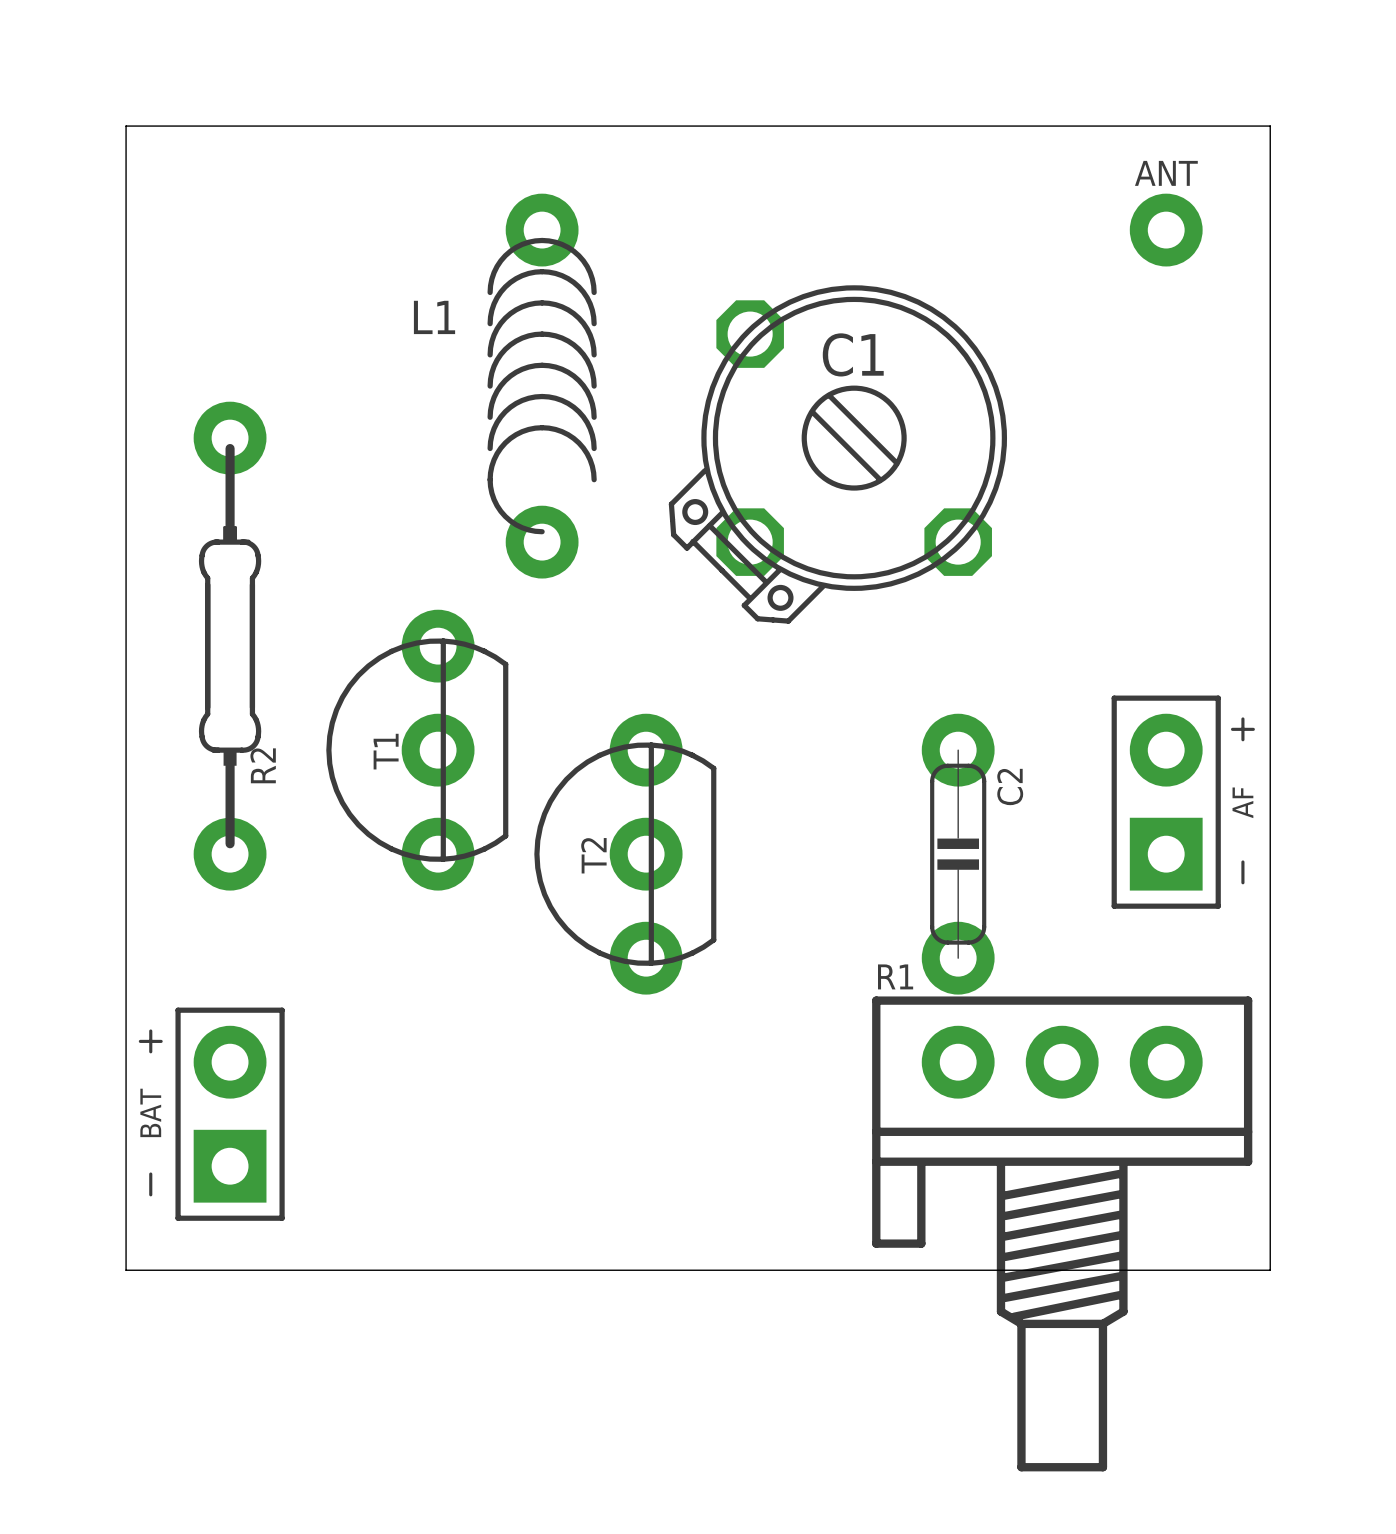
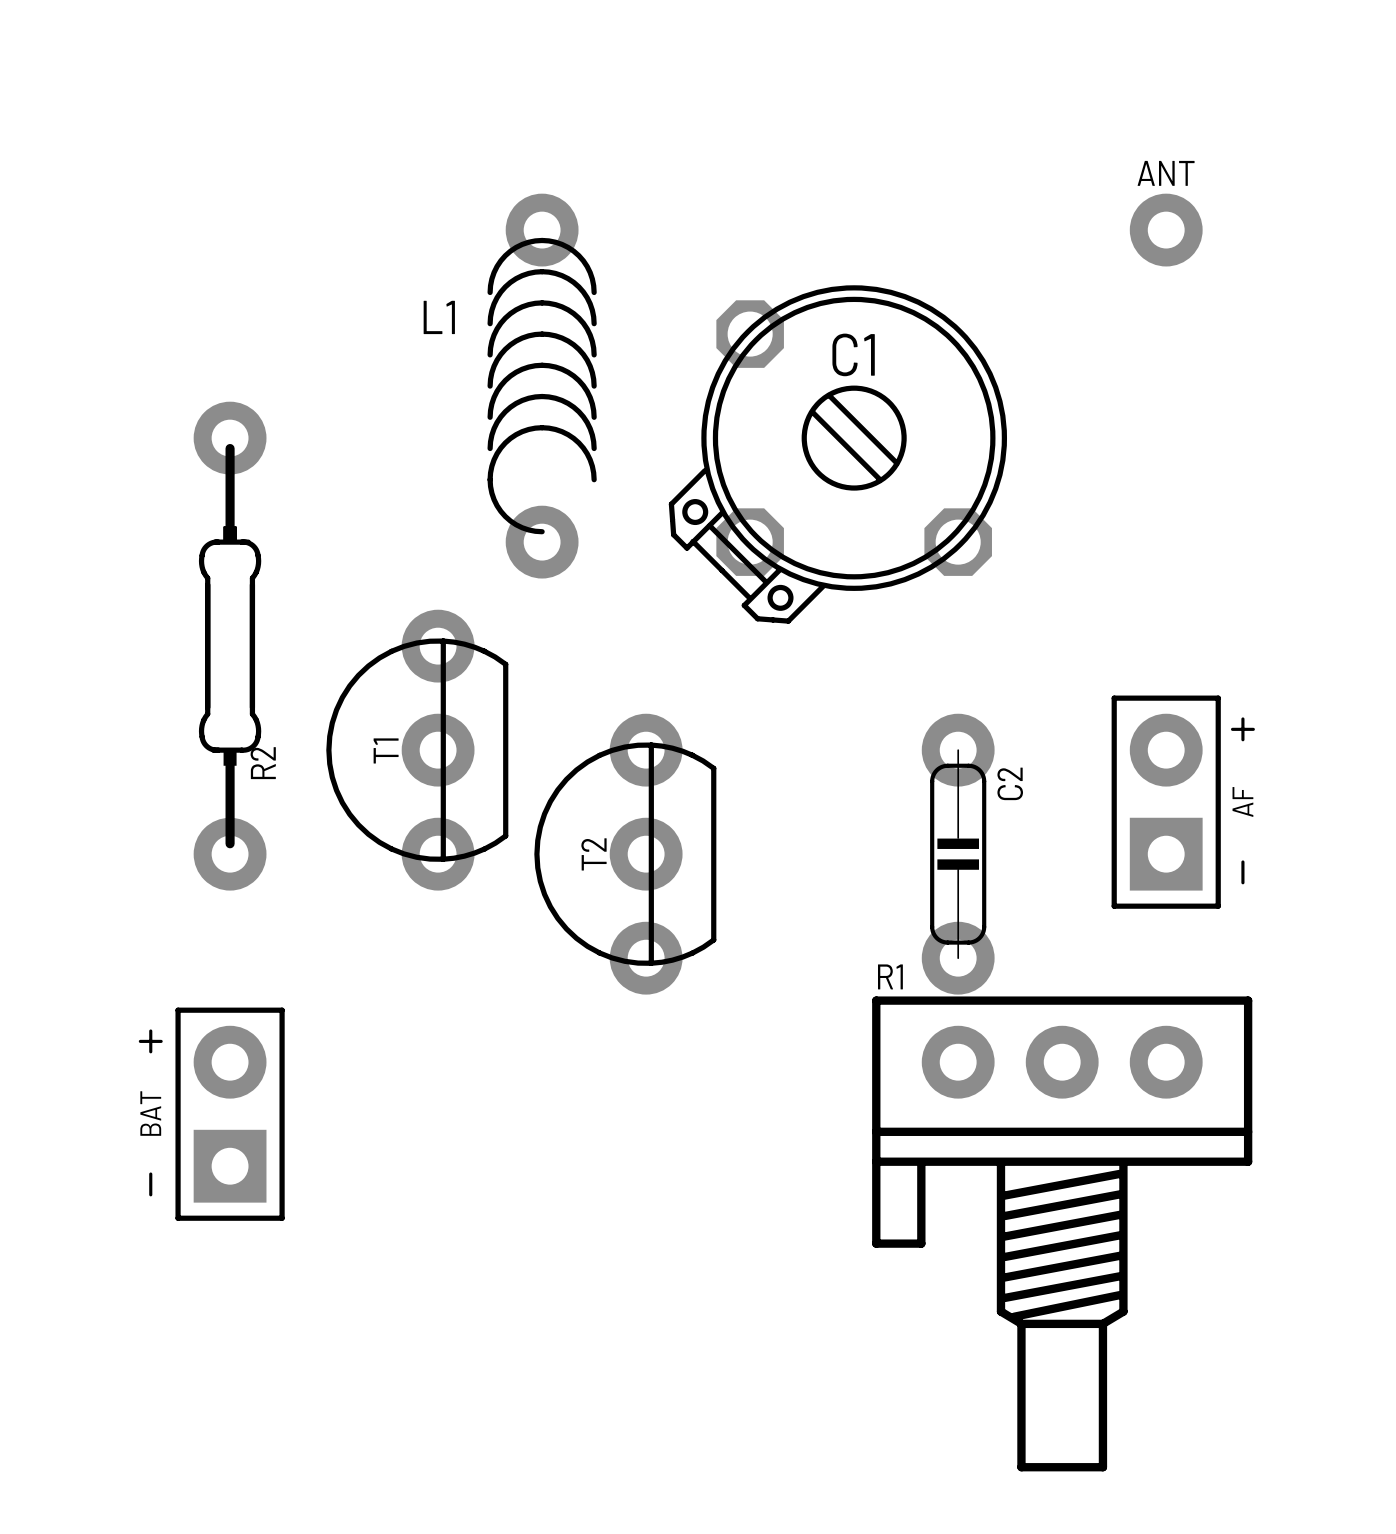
board edge: (126, 126) (1270, 126) (1270, 1270) (126, 1270) (126, 126) -> none

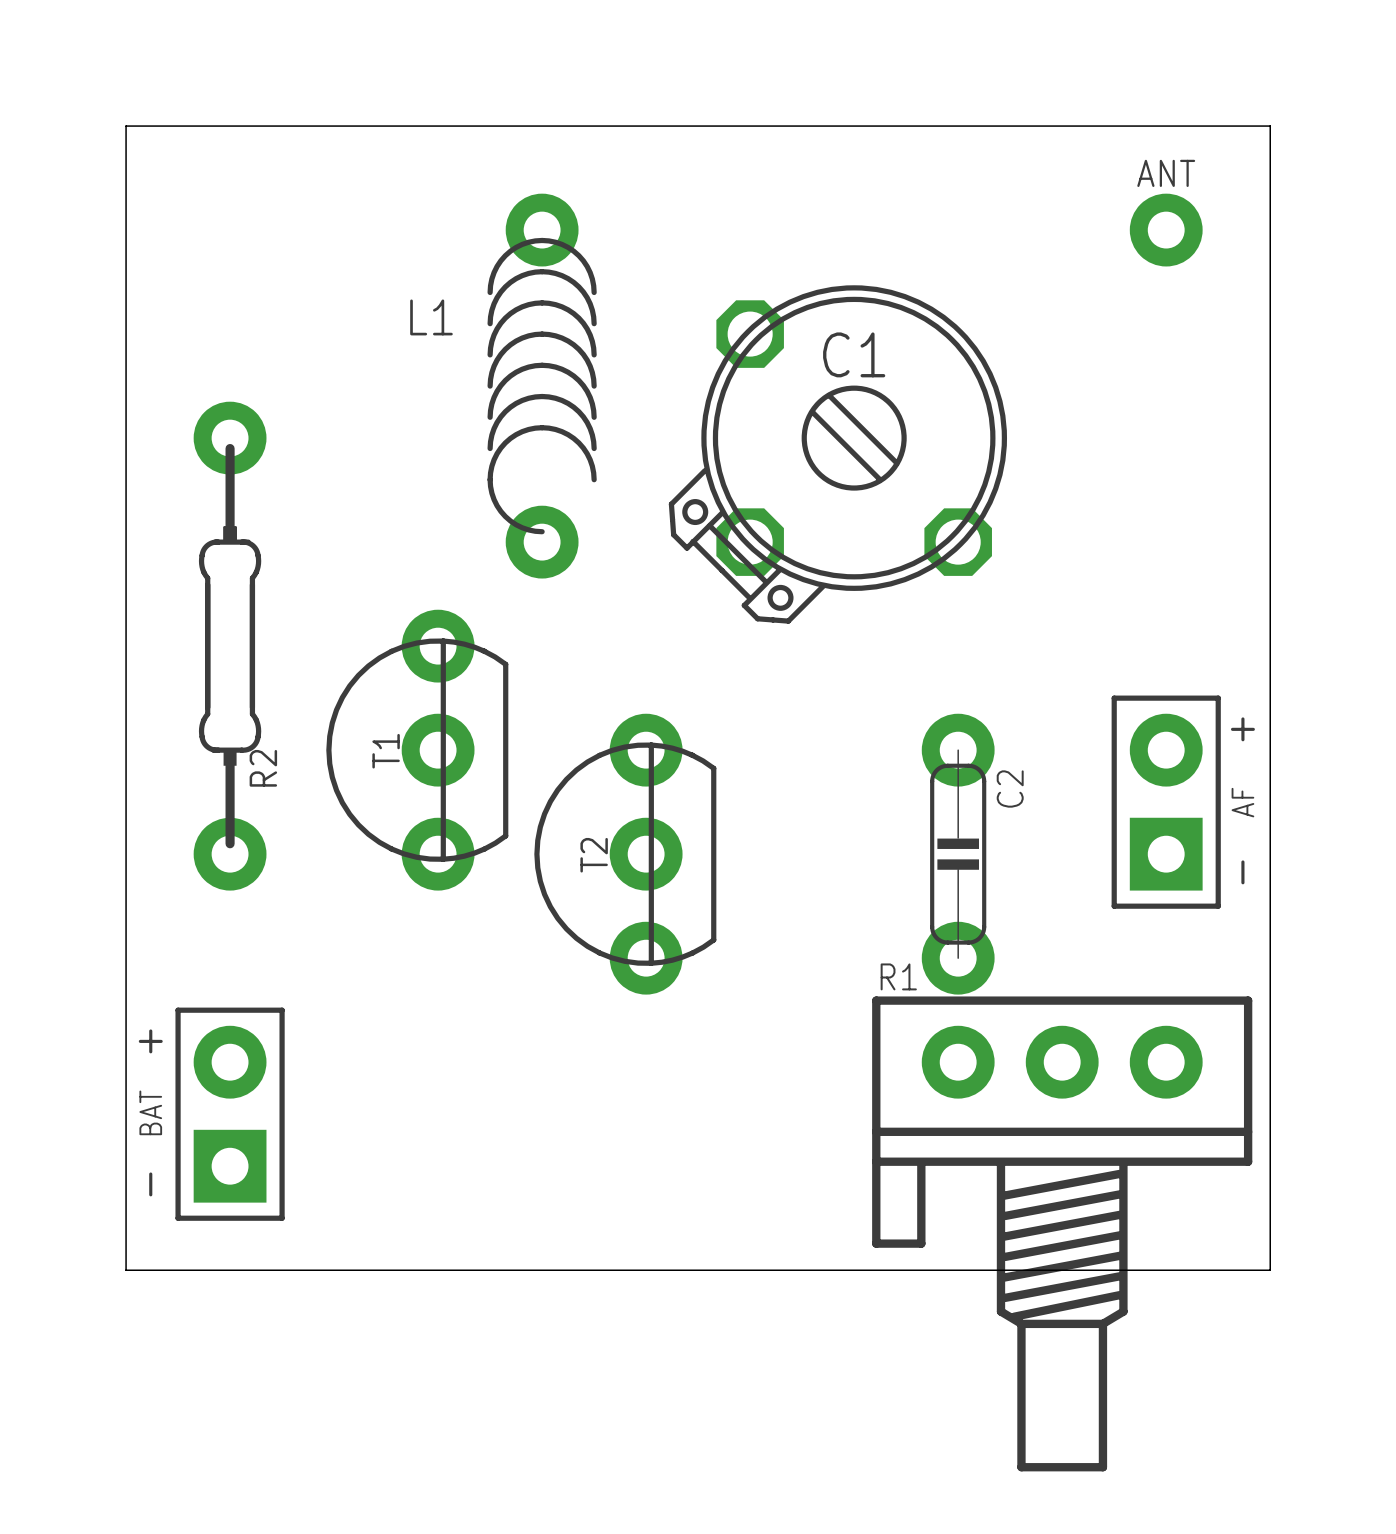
board edge: none -> (126, 126) (1270, 126) (1270, 1270) (126, 1270) (126, 126)

